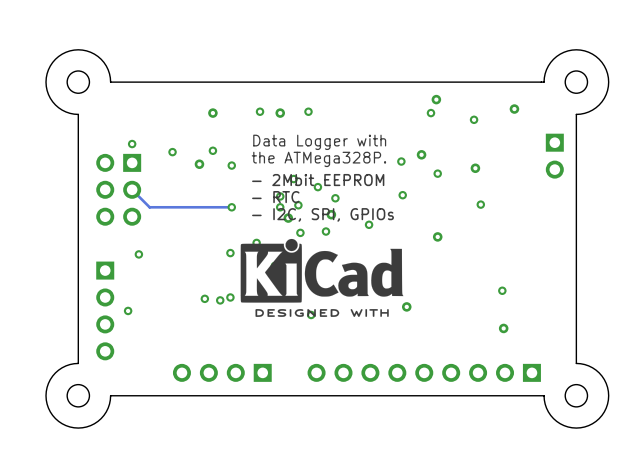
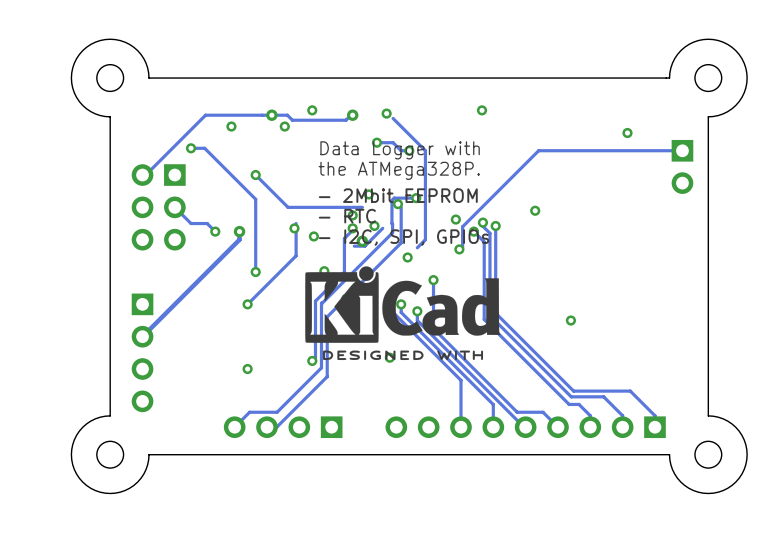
via: (436, 99) -> none
via: none -> (482, 110)
via: (514, 109) -> none
via position: (260, 111) -> (312, 110)
track: none -> (352, 113) (345, 120) (292, 120) (287, 115) (205, 115) (145, 175) (142, 175)
via: (430, 113) -> none
track: none -> (393, 118) (425, 150) (425, 239) (417, 247)
via position: (474, 119) -> (627, 133)
via: none -> (231, 126)
via: none -> (284, 126)
track: none -> (376, 142) (393, 142) (401, 150) (409, 150)
via: none -> (376, 142)
track: none -> (191, 148) (204, 148) (255, 199) (255, 272)
via: none -> (409, 150)
track: none -> (682, 150) (538, 150) (462, 226) (462, 247)
via position: (132, 144) -> (191, 148)
via: (212, 150) -> none
via: (172, 152) -> none
via: (421, 154) -> none
via: (401, 161) -> none
track: none -> (255, 175) (288, 207) (362, 207)
via: none -> (255, 175)
via position: (199, 164) -> (239, 231)
via: (231, 165) -> none
via: (475, 168) -> none
via: (437, 173) -> none
via: none -> (416, 198)
track: none -> (417, 199) (394, 198) (391, 200) (392, 232) (321, 303) (321, 367) (277, 412) (249, 412) (234, 427)
track: none -> (401, 207) (401, 242) (327, 316) (327, 376) (276, 427) (267, 427)
via: none -> (535, 210)
via: (402, 195) -> none
via: (335, 198) -> none
via: none -> (455, 219)
track: none -> (482, 222) (482, 226) (489, 233) (489, 315) (571, 396) (603, 396) (622, 415) (622, 427)
via: none -> (482, 222)
track: (145, 203) (149, 207) (231, 207) -> (191, 223) (207, 223) (215, 231)
track: none -> (296, 223) (296, 255) (247, 304)
via: (480, 204) -> none
track: none -> (495, 226) (495, 313) (573, 391) (630, 391) (654, 415) (654, 427)
via: none -> (495, 226)
track: none -> (354, 228) (344, 238) (344, 271)
track: none -> (382, 228) (364, 246) (354, 246)
via: none -> (215, 231)
track: none -> (239, 231) (239, 239) (142, 336)
track: none -> (473, 231) (484, 241) (484, 319) (569, 404) (579, 404) (590, 415) (590, 427)
via: none -> (473, 231)
via: none -> (313, 236)
via: (331, 214) -> none
via: (300, 232) -> none
via: (437, 236) -> none
via: none -> (255, 272)
track: none -> (344, 272) (315, 301) (315, 357) (312, 360)
track: none -> (433, 280) (433, 328) (517, 412) (543, 412) (557, 427)
via: none -> (433, 280)
via: (230, 253) -> none
via: (138, 254) -> none
via: none -> (247, 304)
track: none -> (385, 304) (460, 380) (460, 427)
track: none -> (401, 304) (401, 312) (493, 404) (493, 427)
via: none -> (401, 304)
track: none -> (417, 311) (417, 320) (525, 427)
via: none -> (417, 311)
via: none -> (570, 320)
via: (502, 290) -> none
via: (230, 297) -> none
via: (204, 298) -> none
via: (220, 300) -> none
via: (406, 306) -> none
via: (128, 310) -> none
via: none -> (312, 360)
via: none -> (247, 369)
via: (503, 328) -> none

